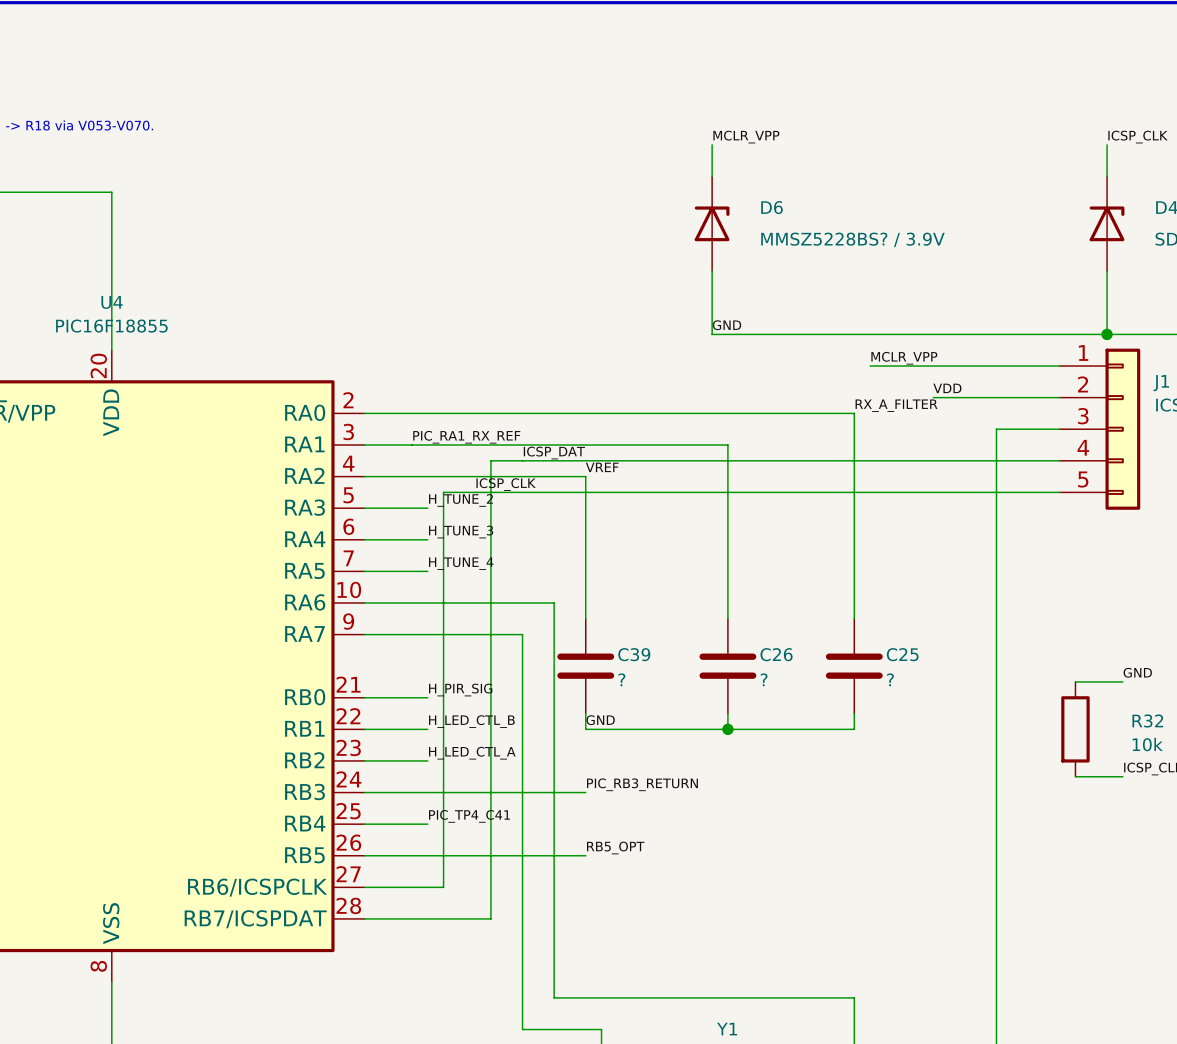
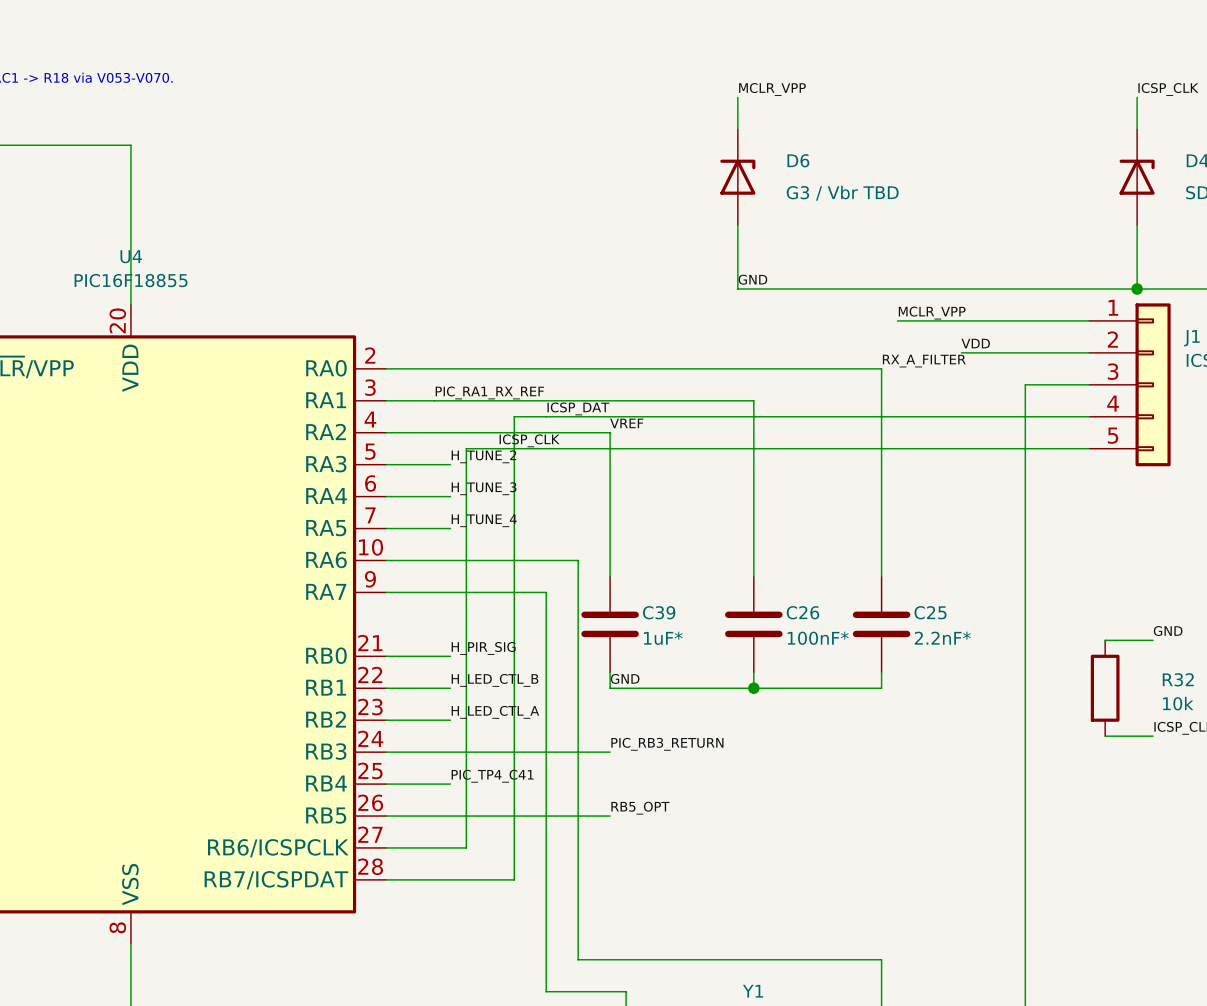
D6 value: MMSZ5228BS? / 3.9V (852, 239) -> G3 / Vbr TBD (842, 193)
C39 value: ? (621, 679) -> 1uF* (663, 638)
C26 value: ? (764, 679) -> 100nF* (818, 638)
C25 value: ? (890, 679) -> 2.2nF* (942, 638)

